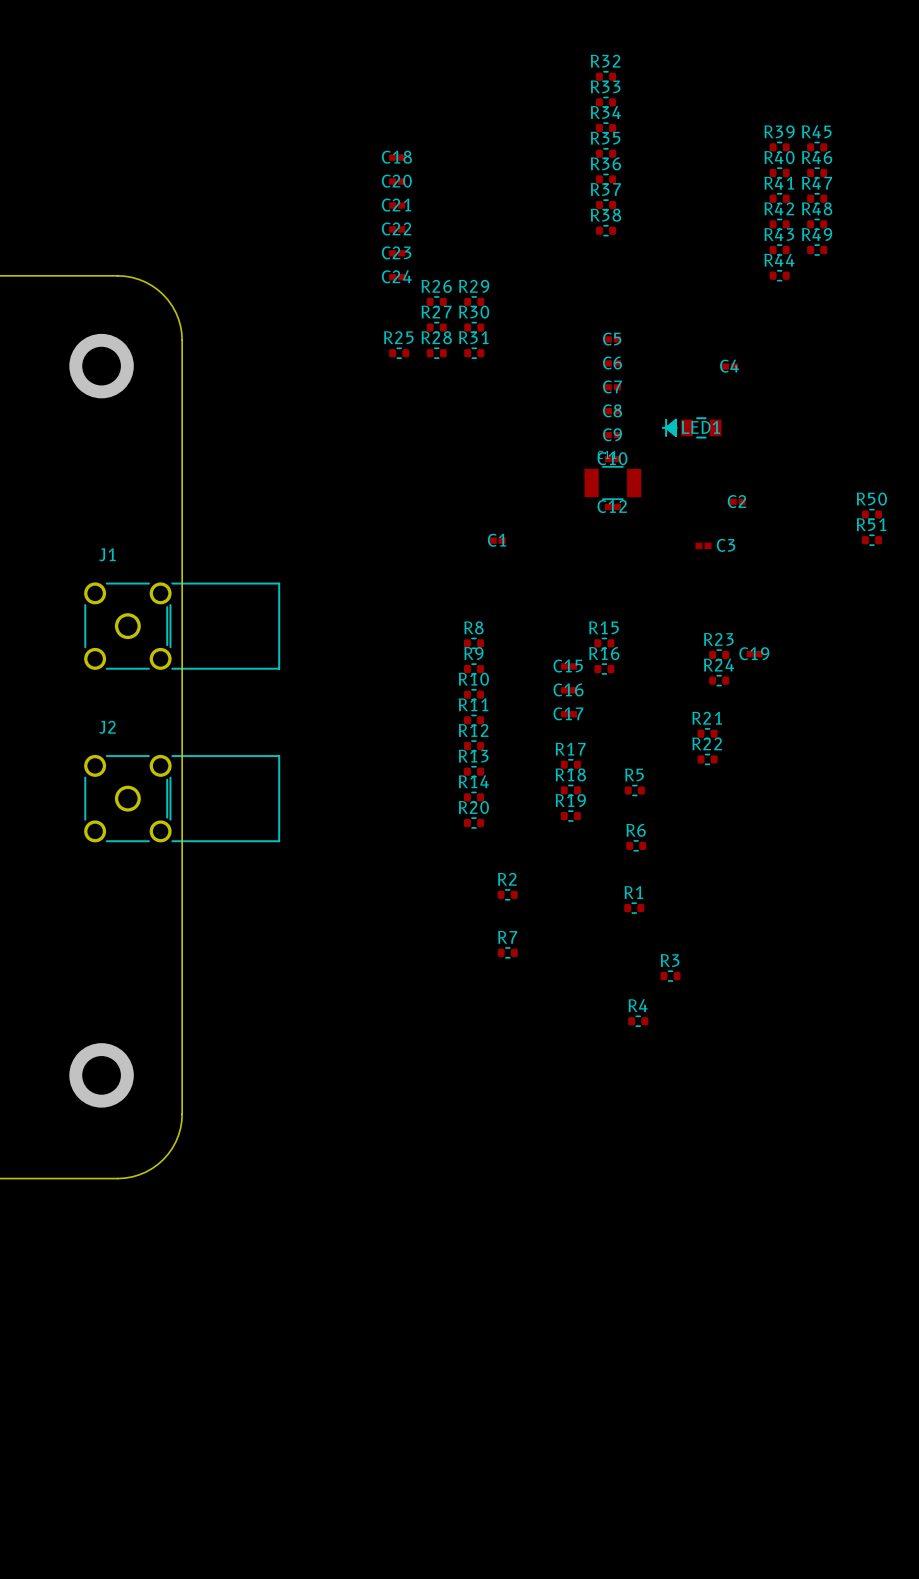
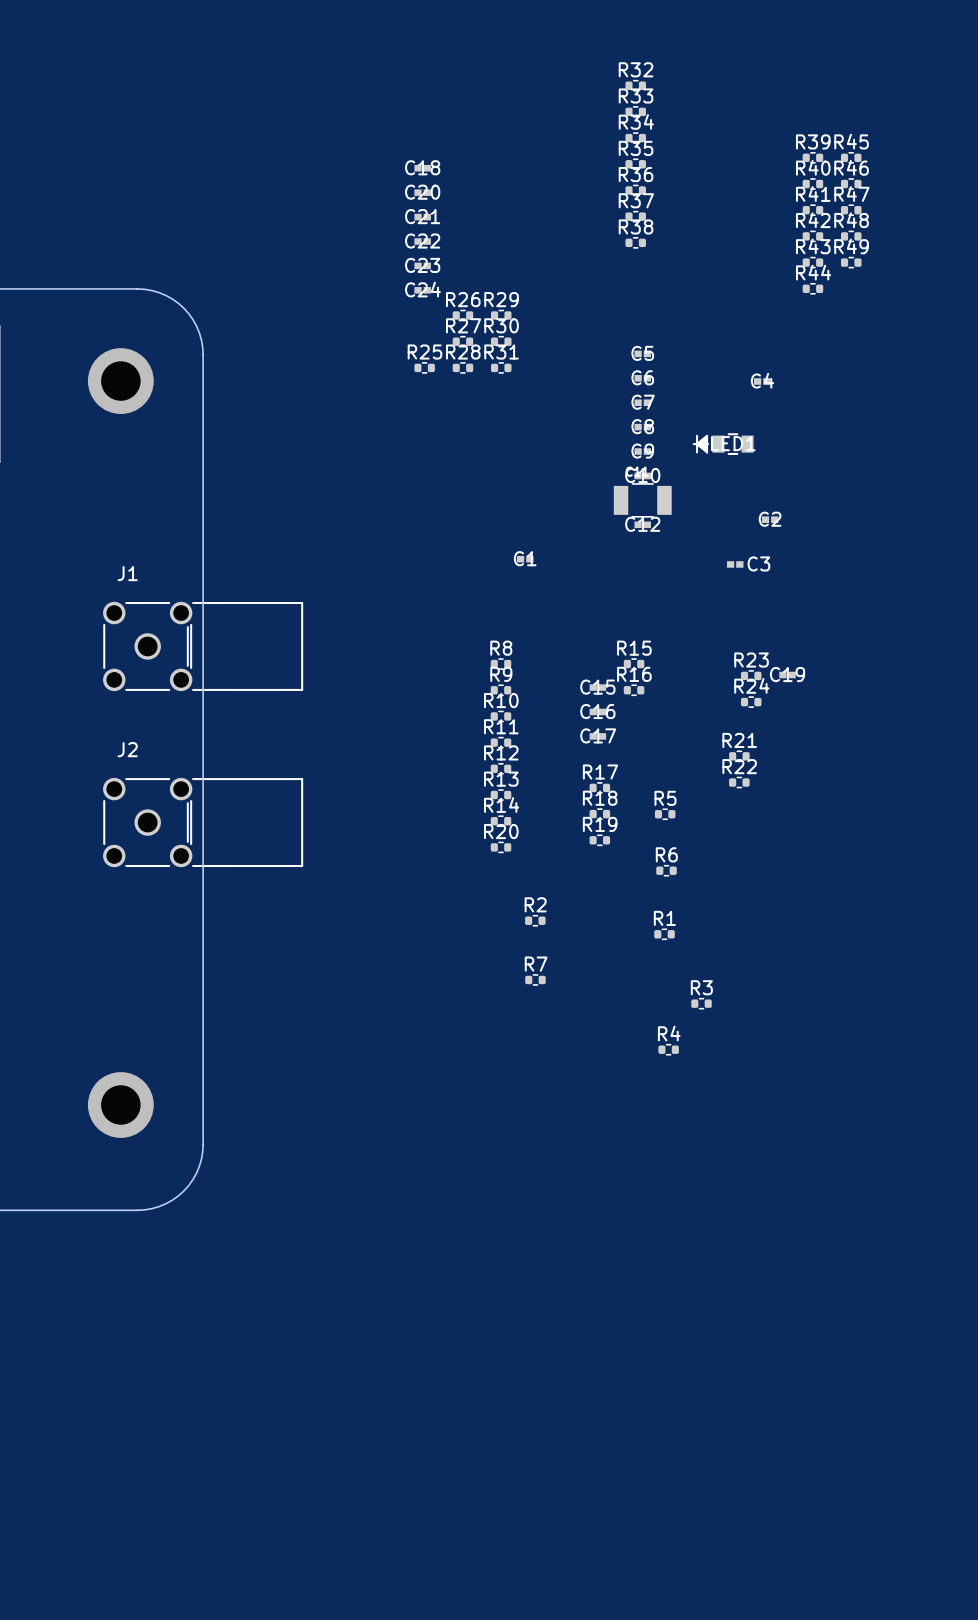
R50: (871, 514) -> none
R51: (871, 540) -> none

